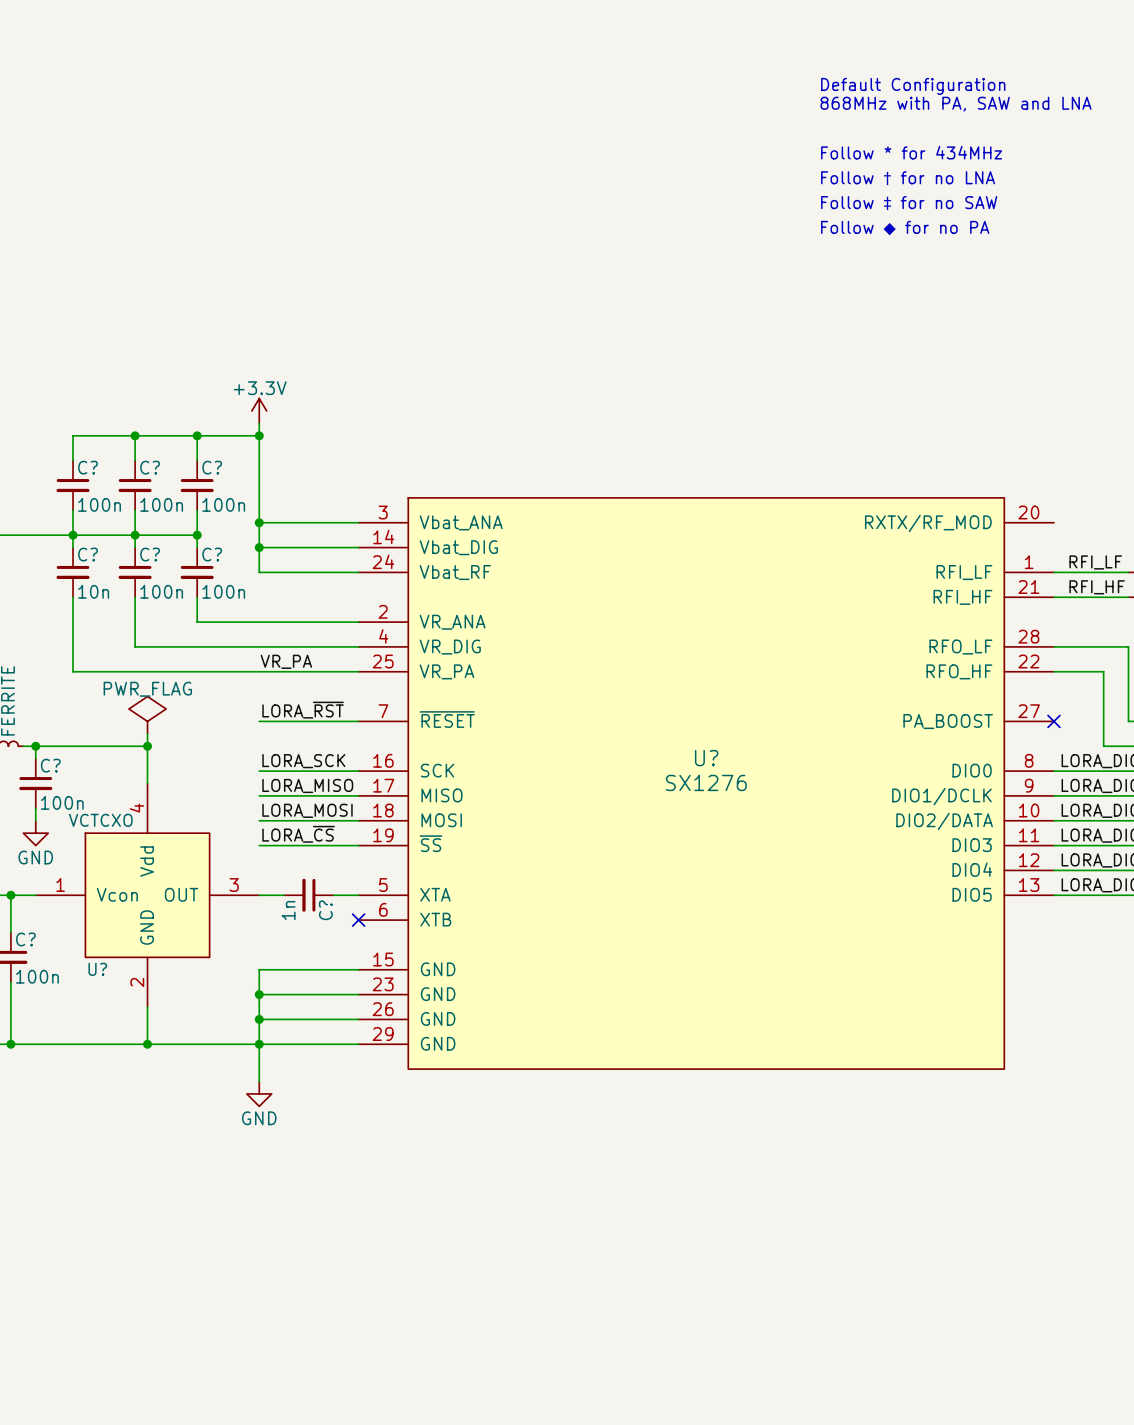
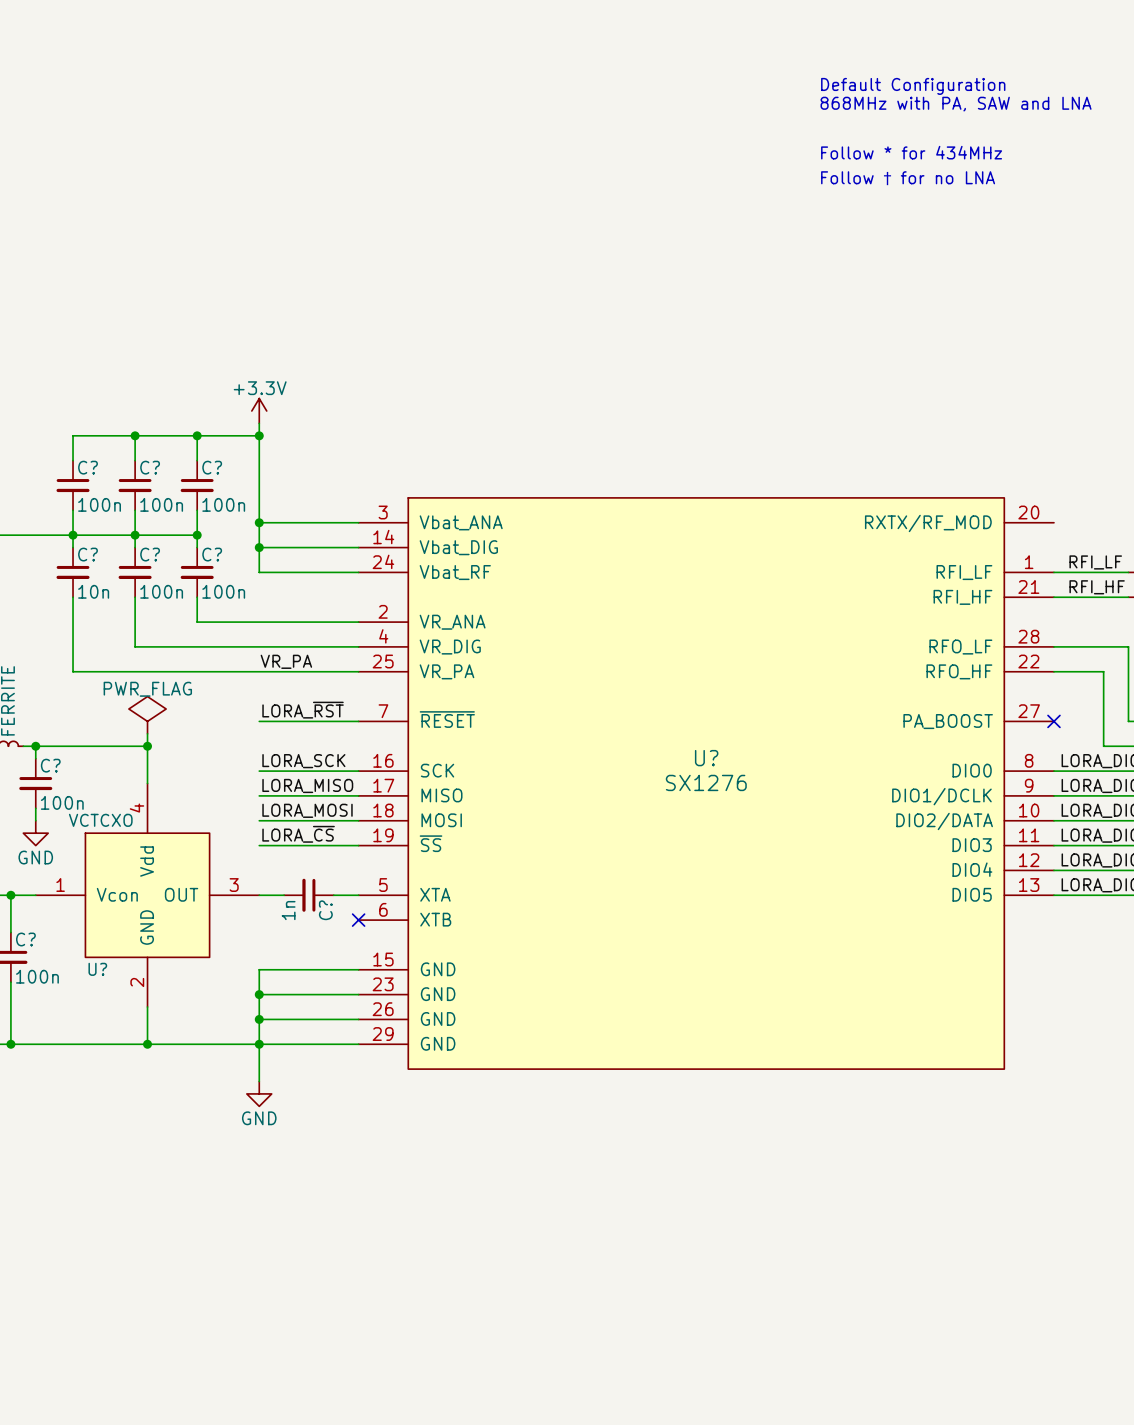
text: Follow ‡ for no SAW (909, 203) -> none
text: Follow ◆ for no PA (905, 228) -> none

